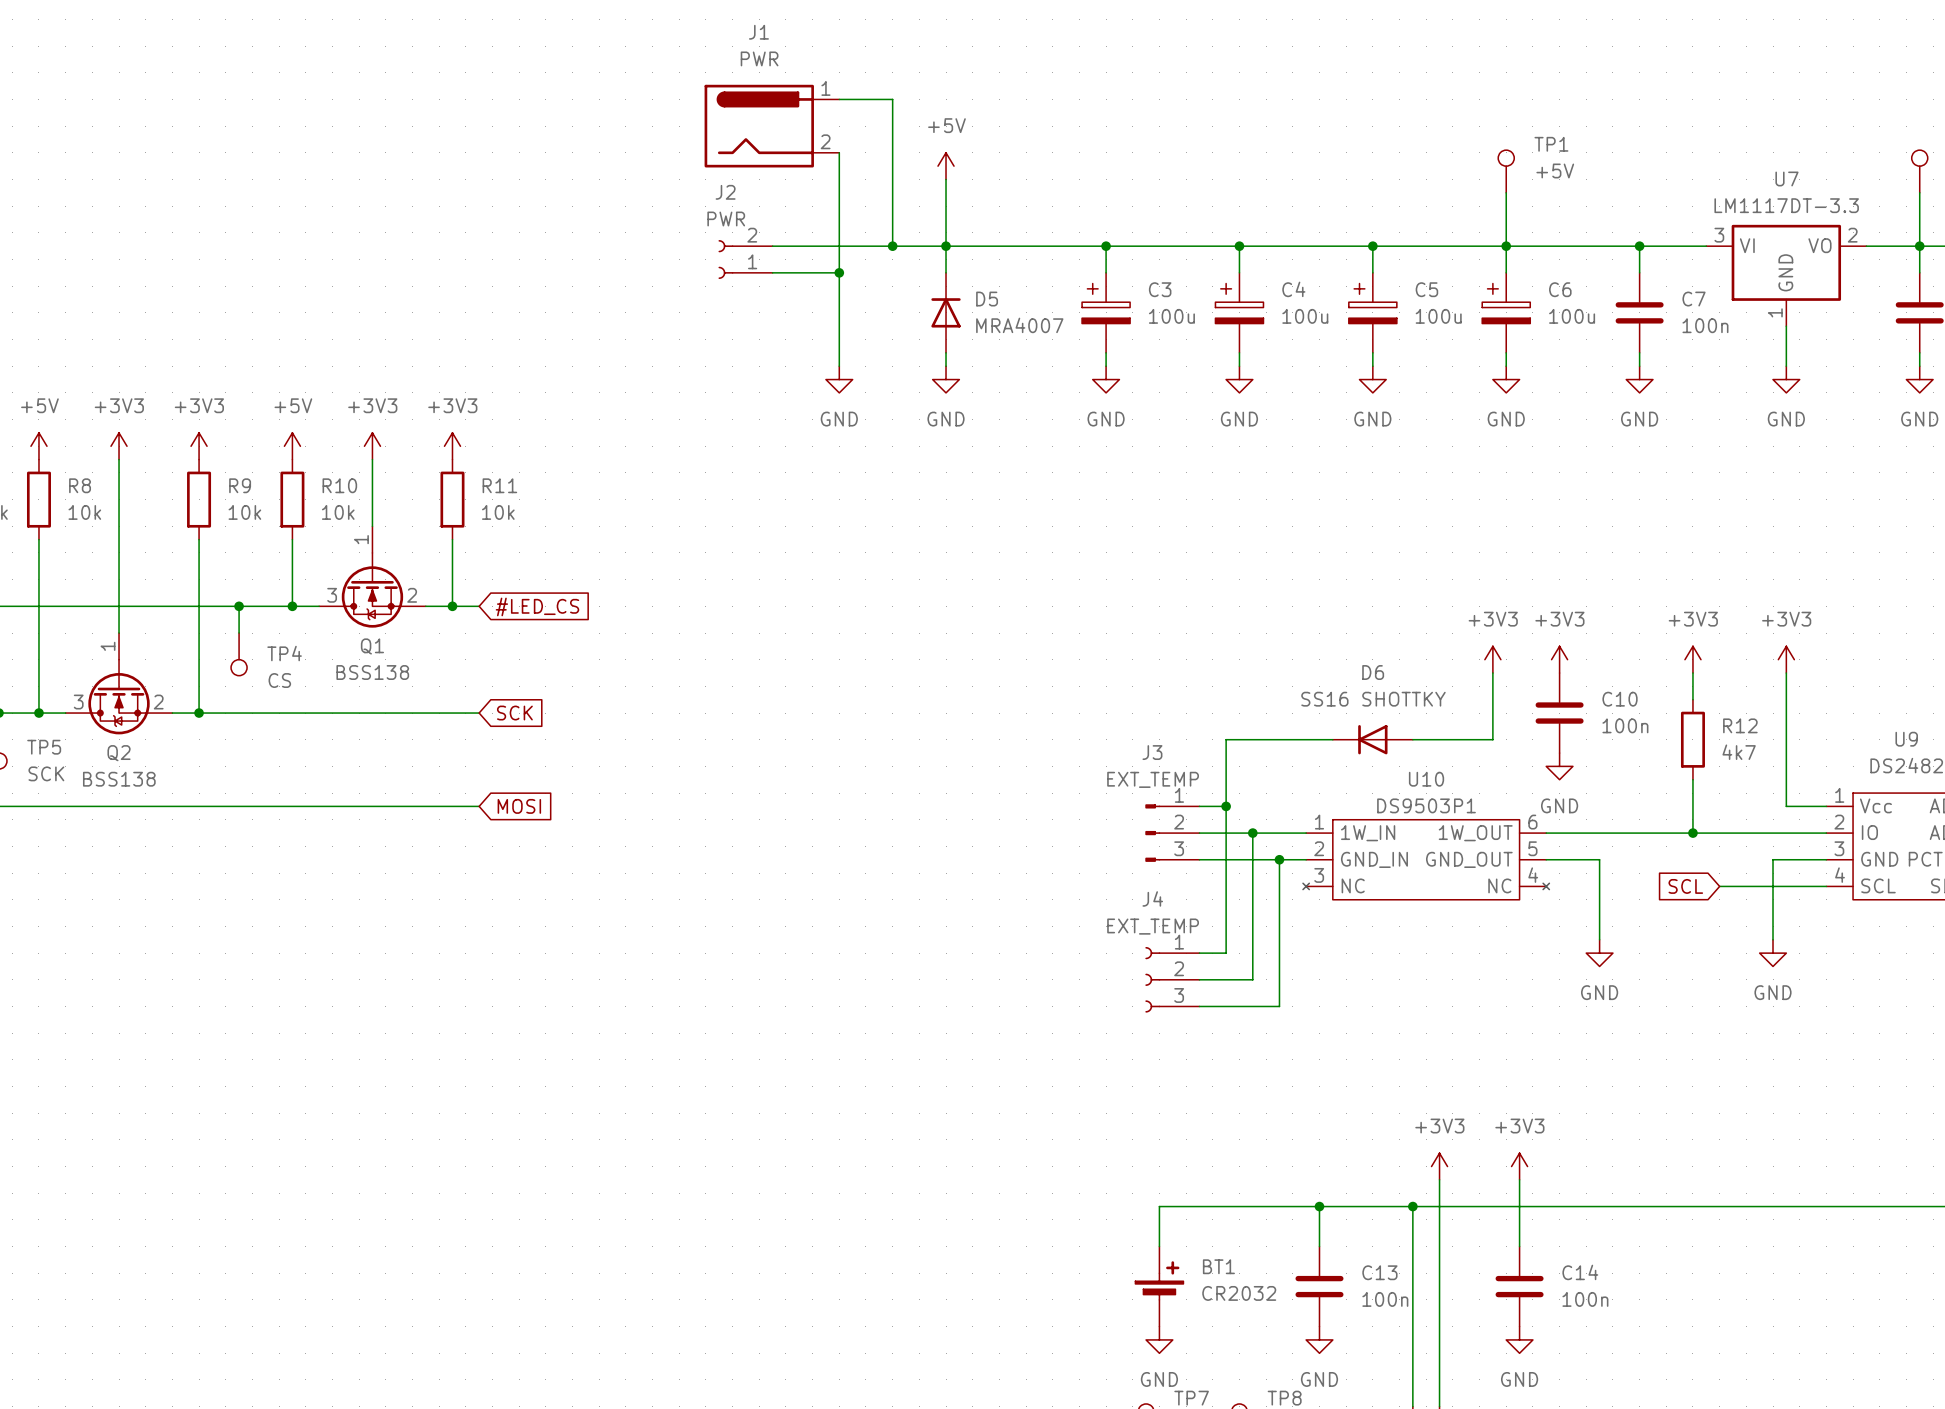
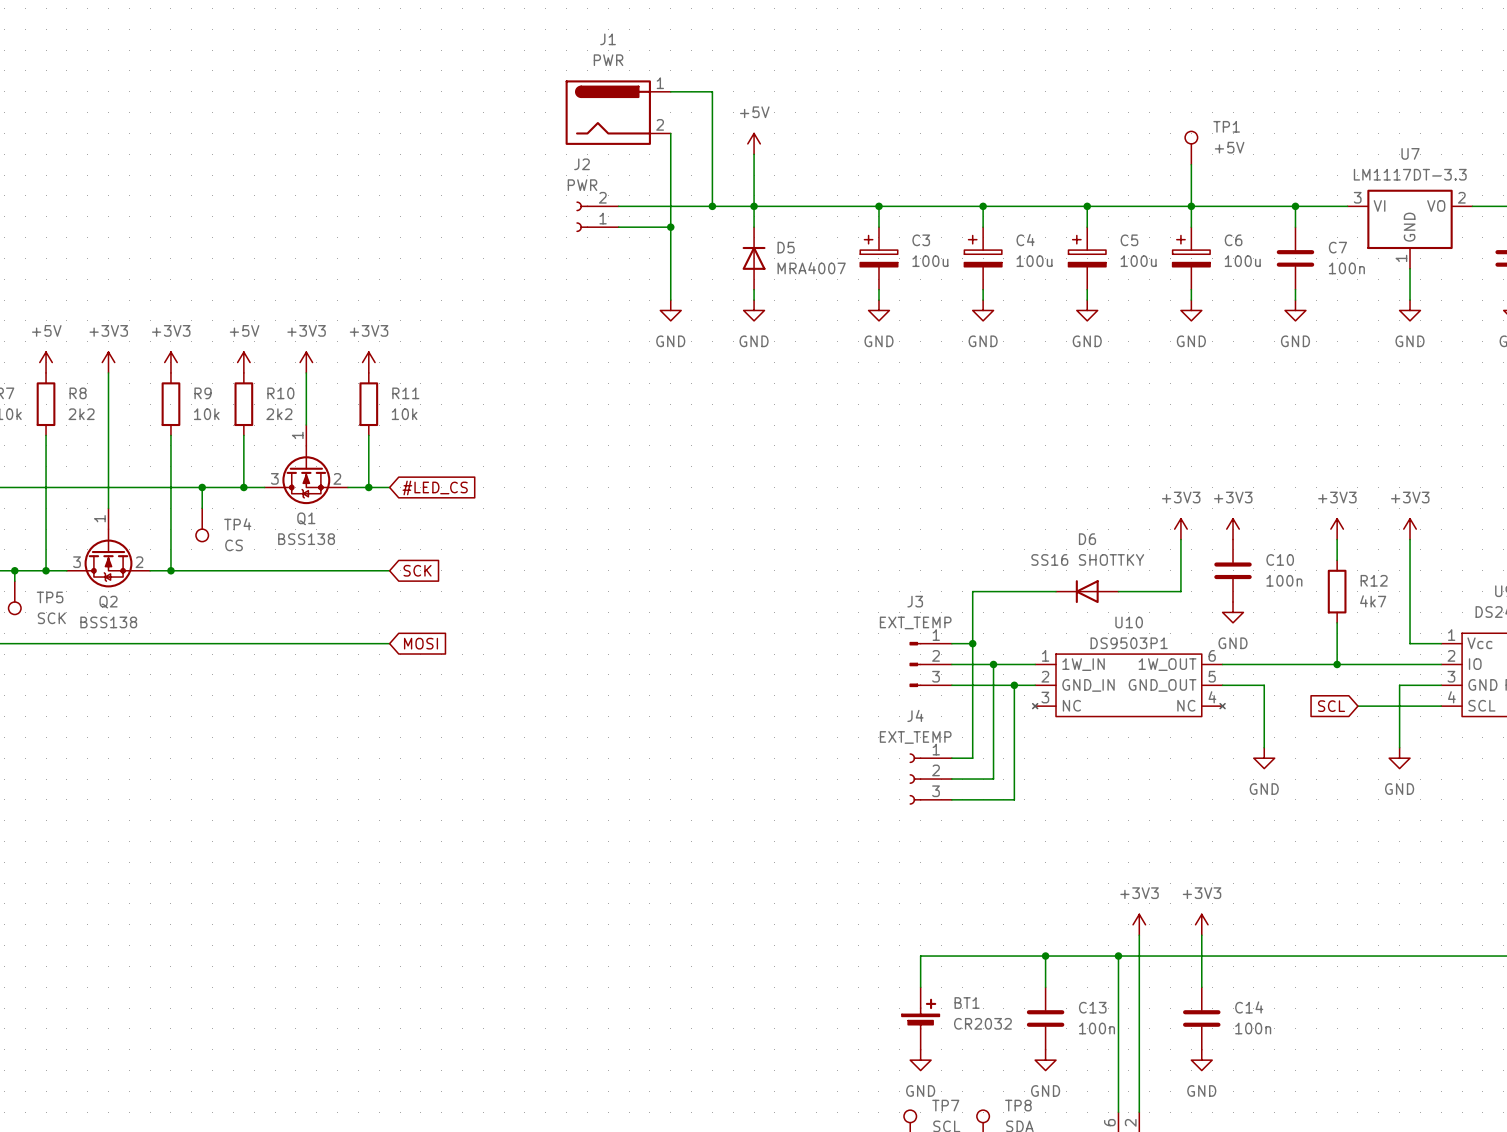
R8 value: 10k (84, 512) -> 2k2 (81, 414)
R10 value: 10k (338, 512) -> 2k2 (279, 414)

